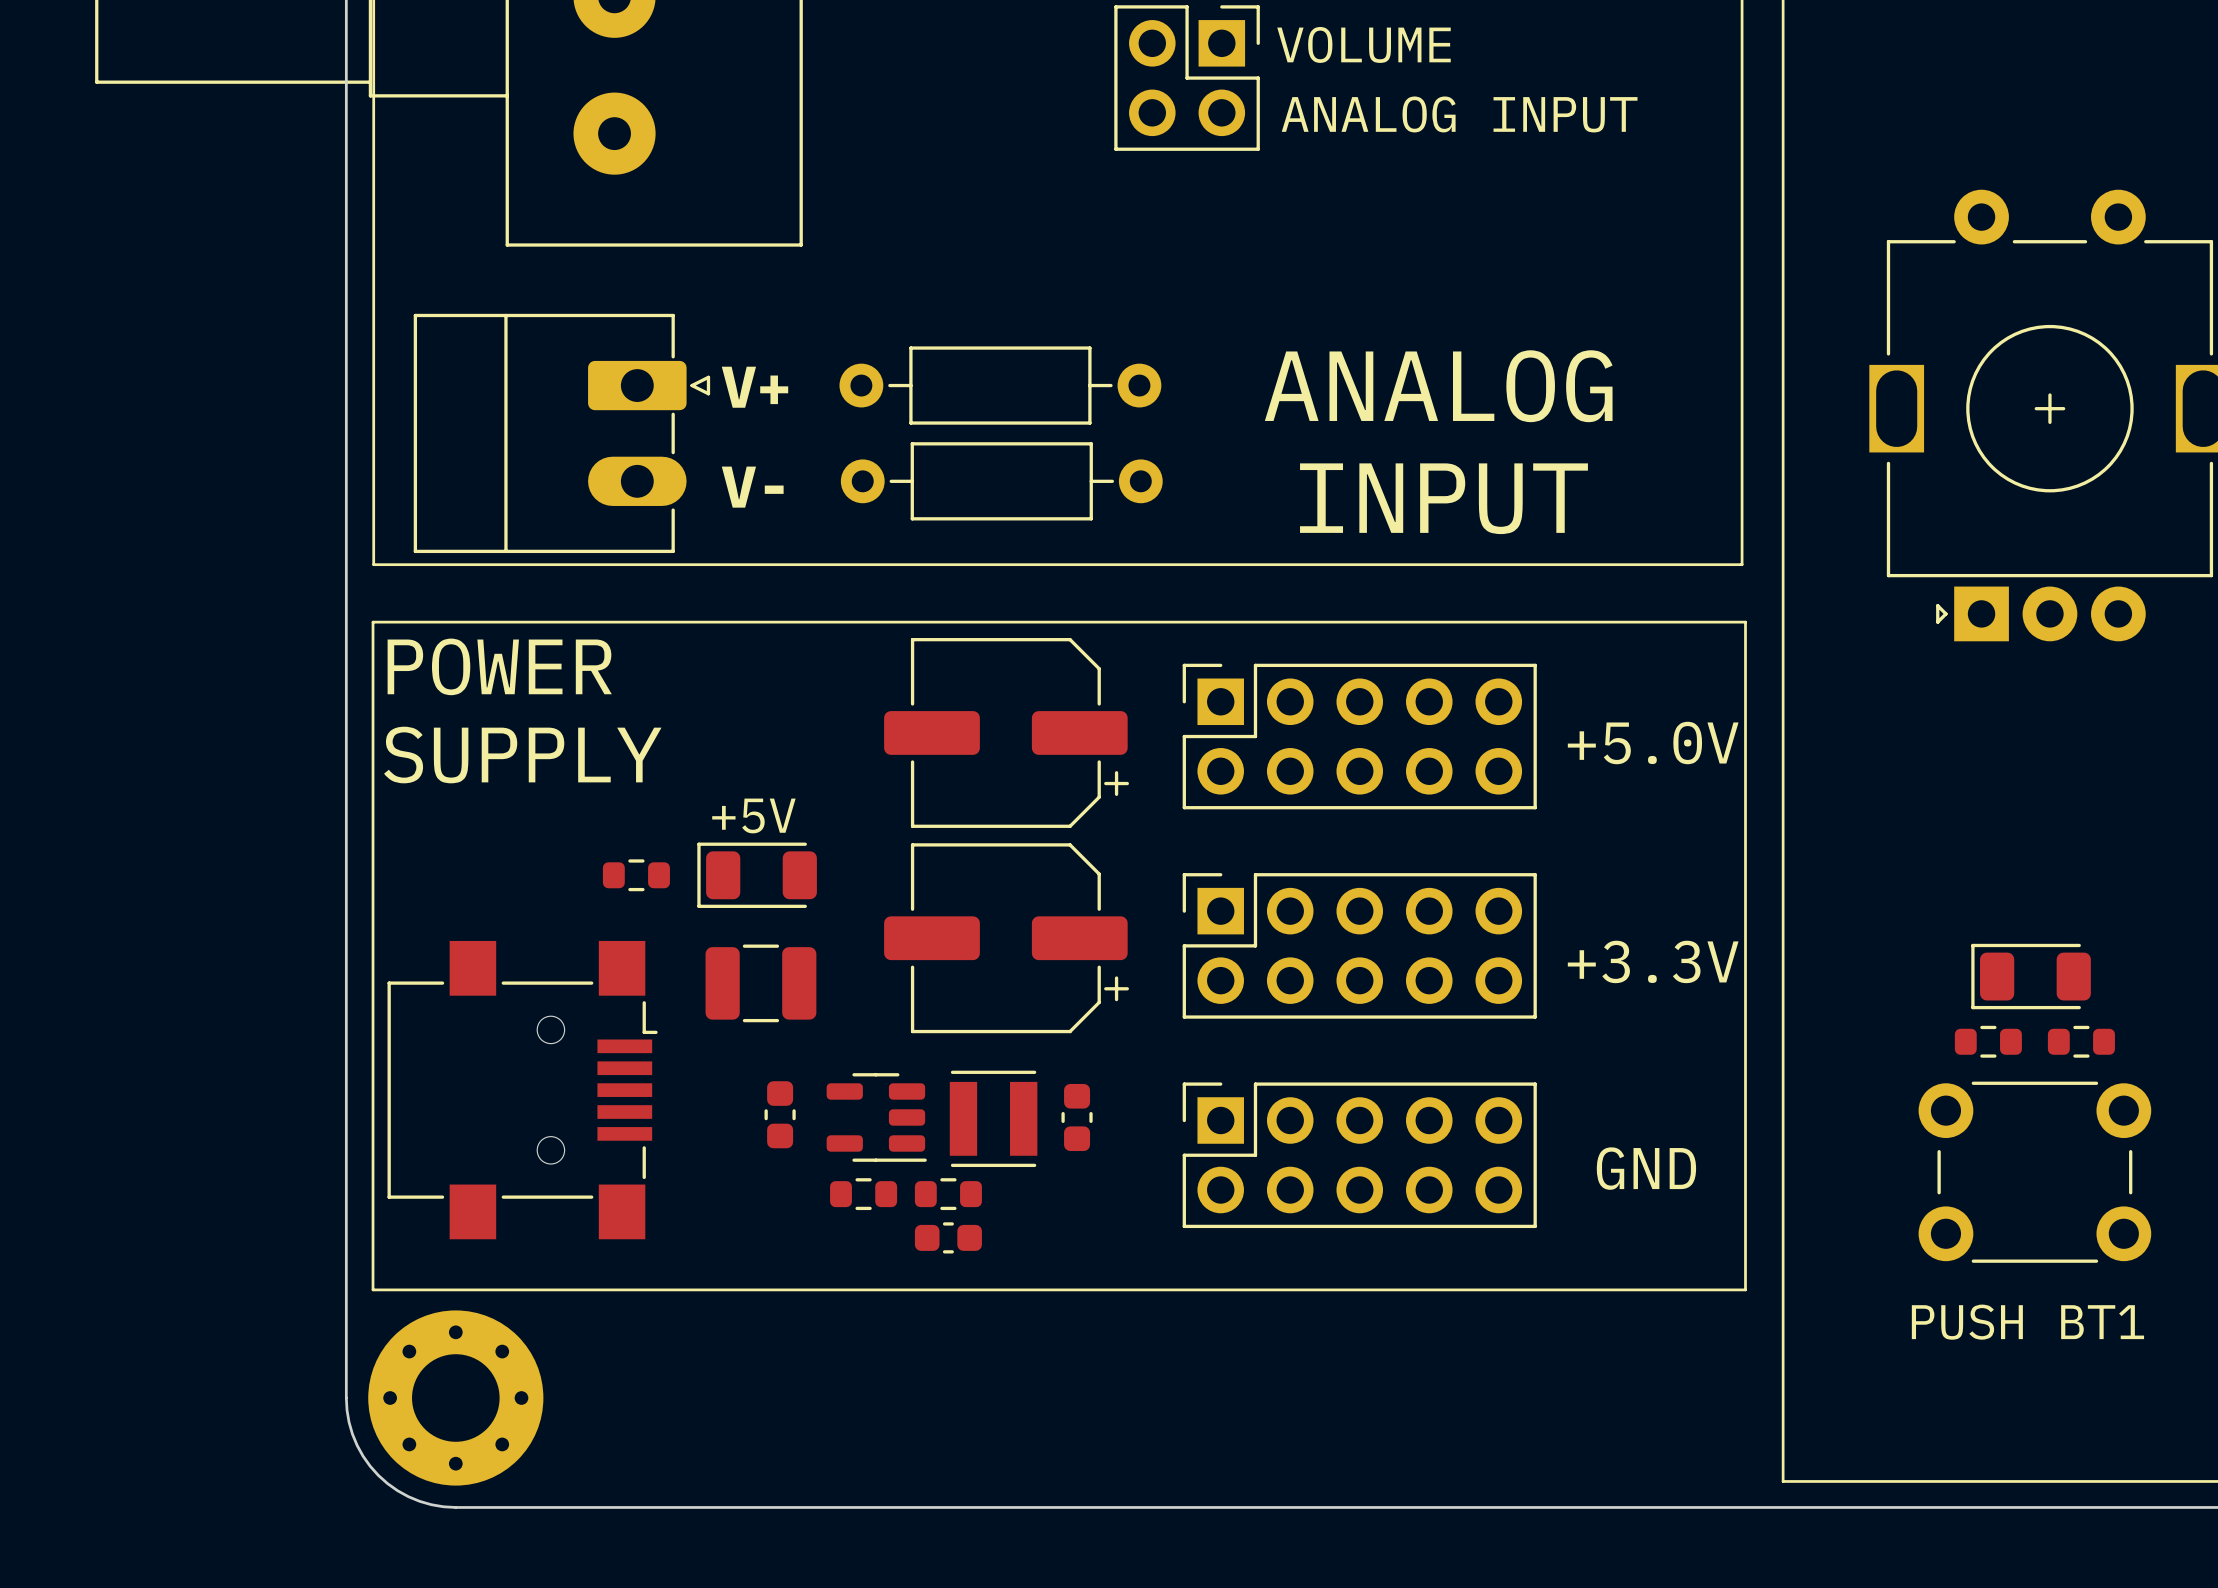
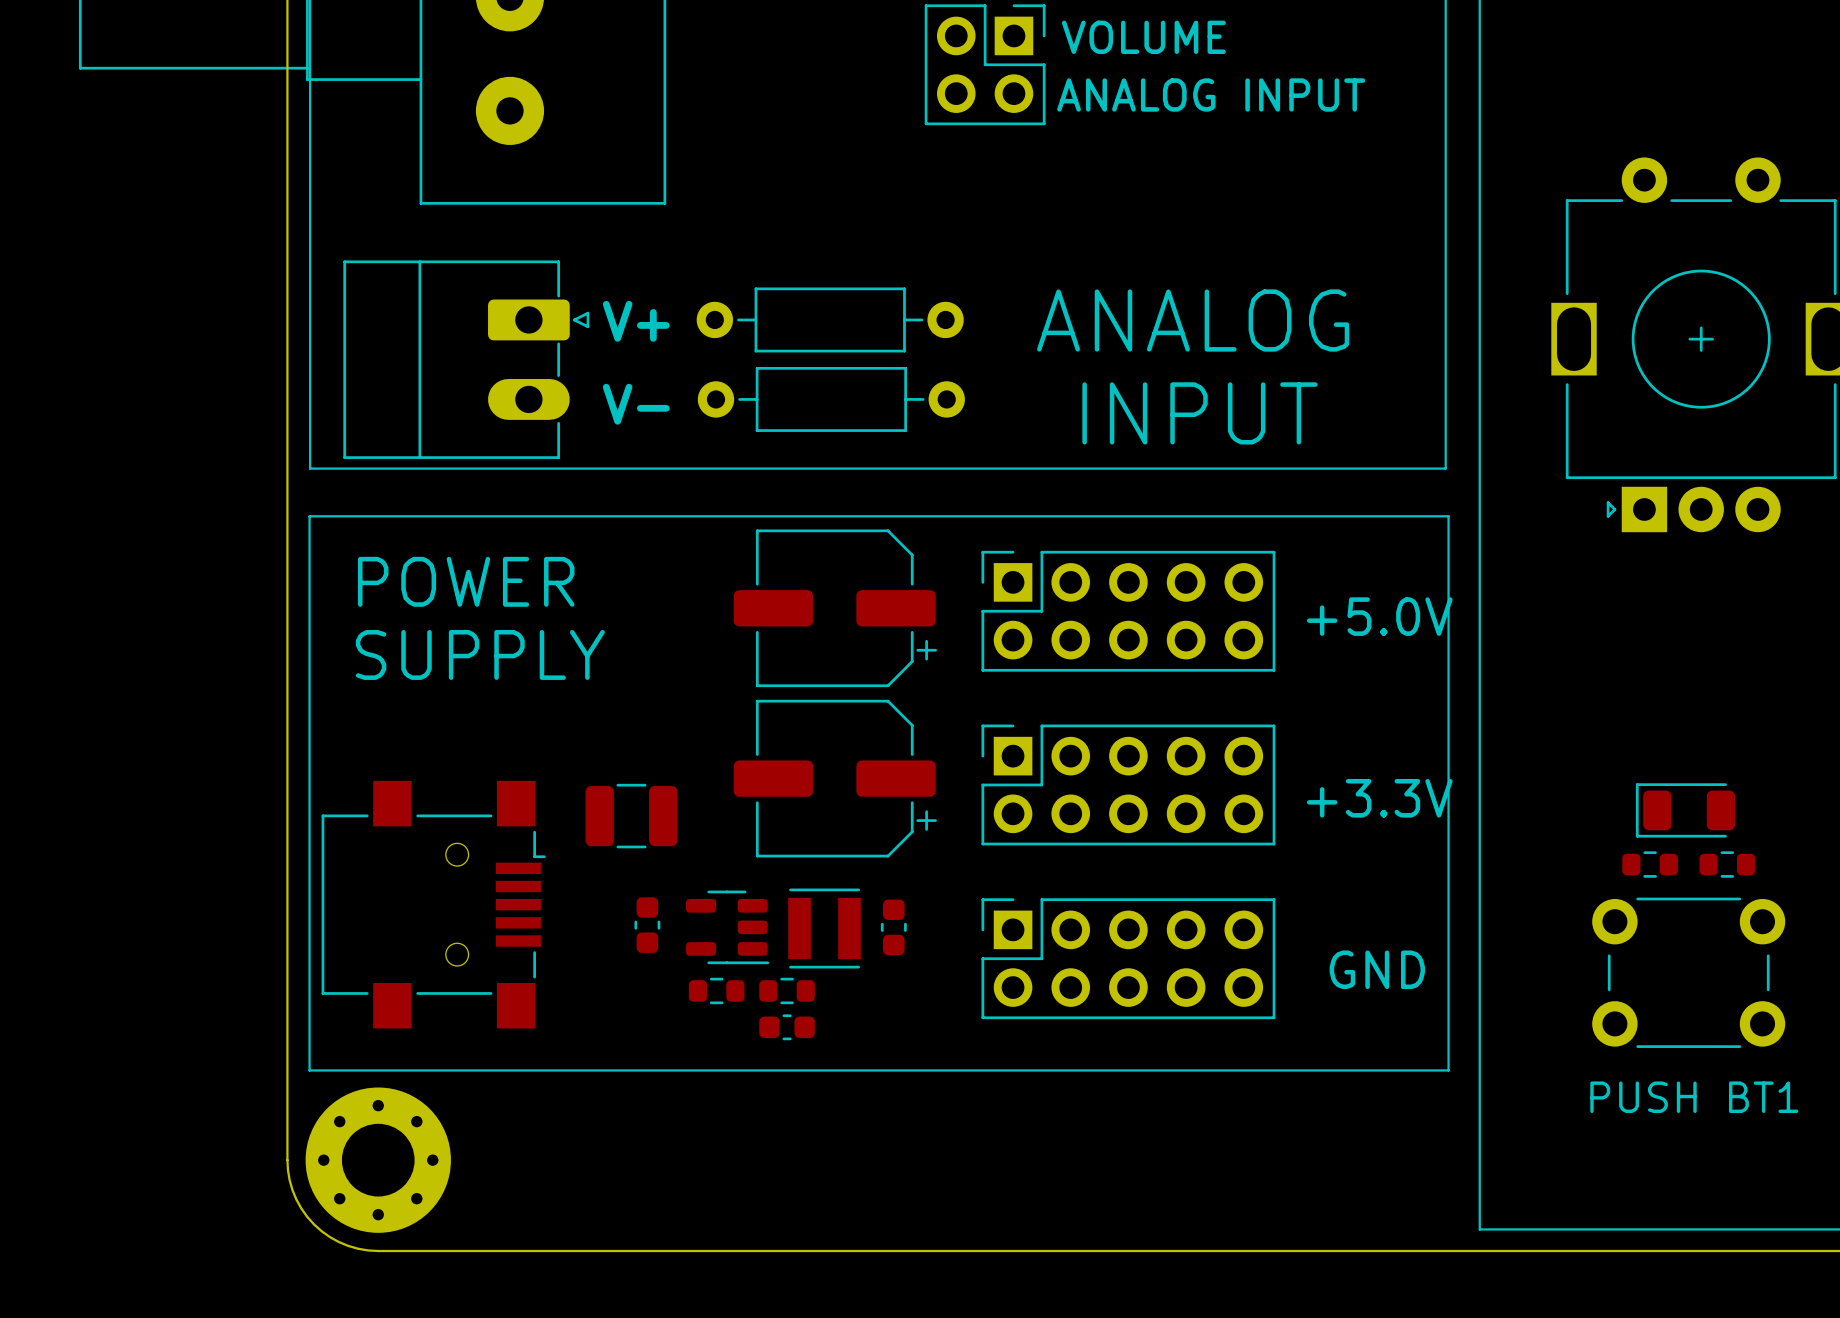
text position: POWER (499, 666) -> POWER (466, 581)
text position: SUPPLY (522, 755) -> SUPPLY (480, 654)
text: +5V (753, 815) -> none
part: (636, 875) -> none
part: (757, 875) -> none

